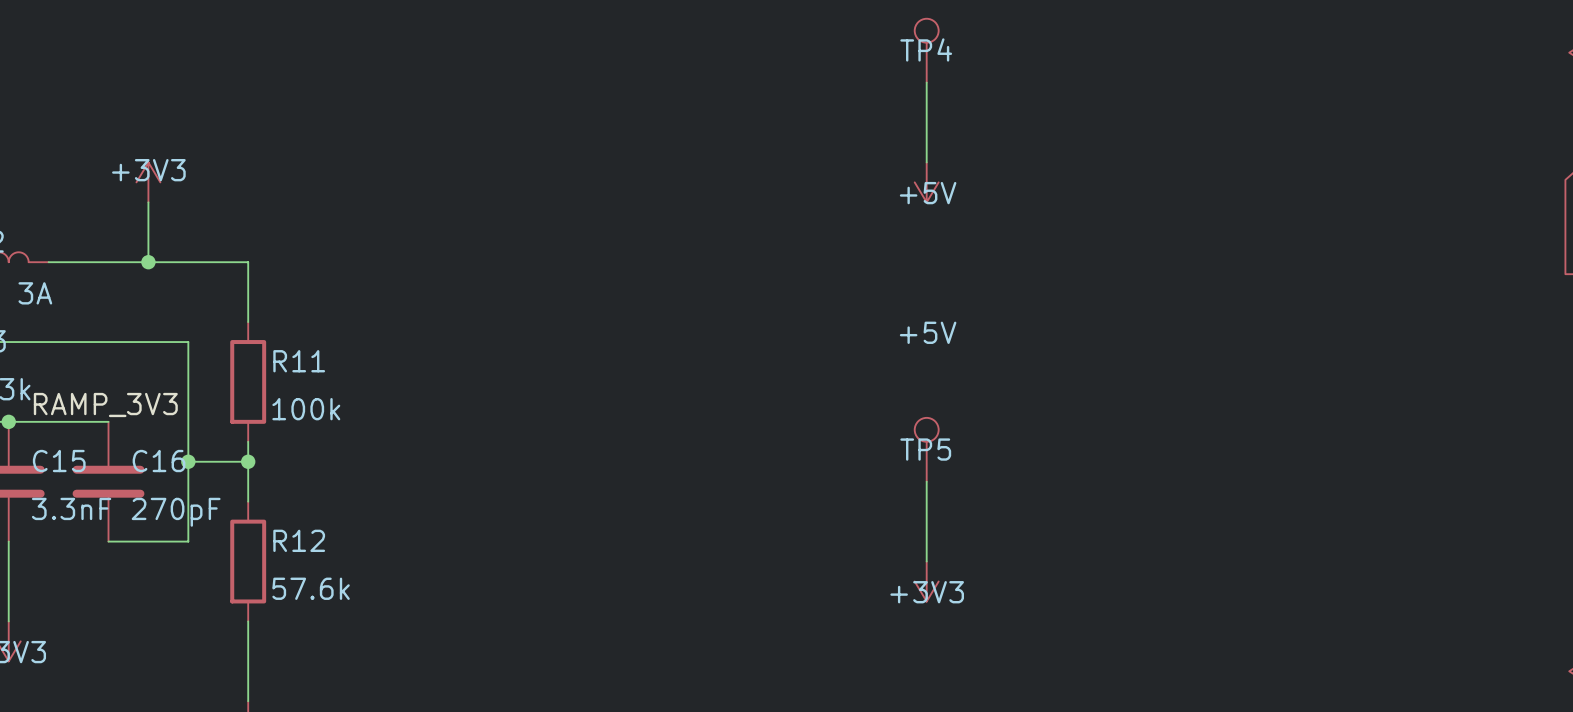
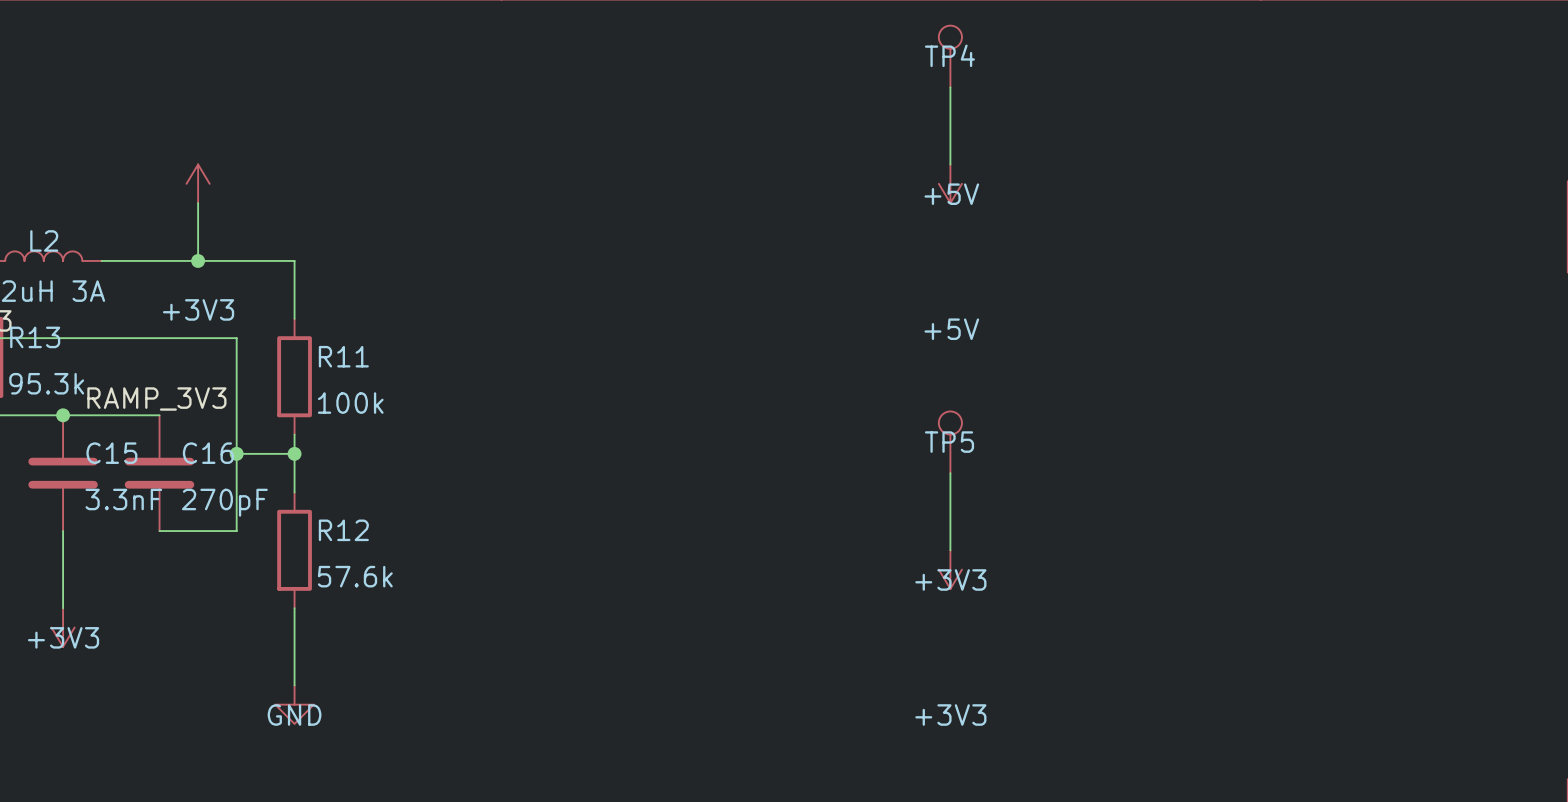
power symbol text position: +3V3 (148, 170) -> +3V3 (198, 309)

